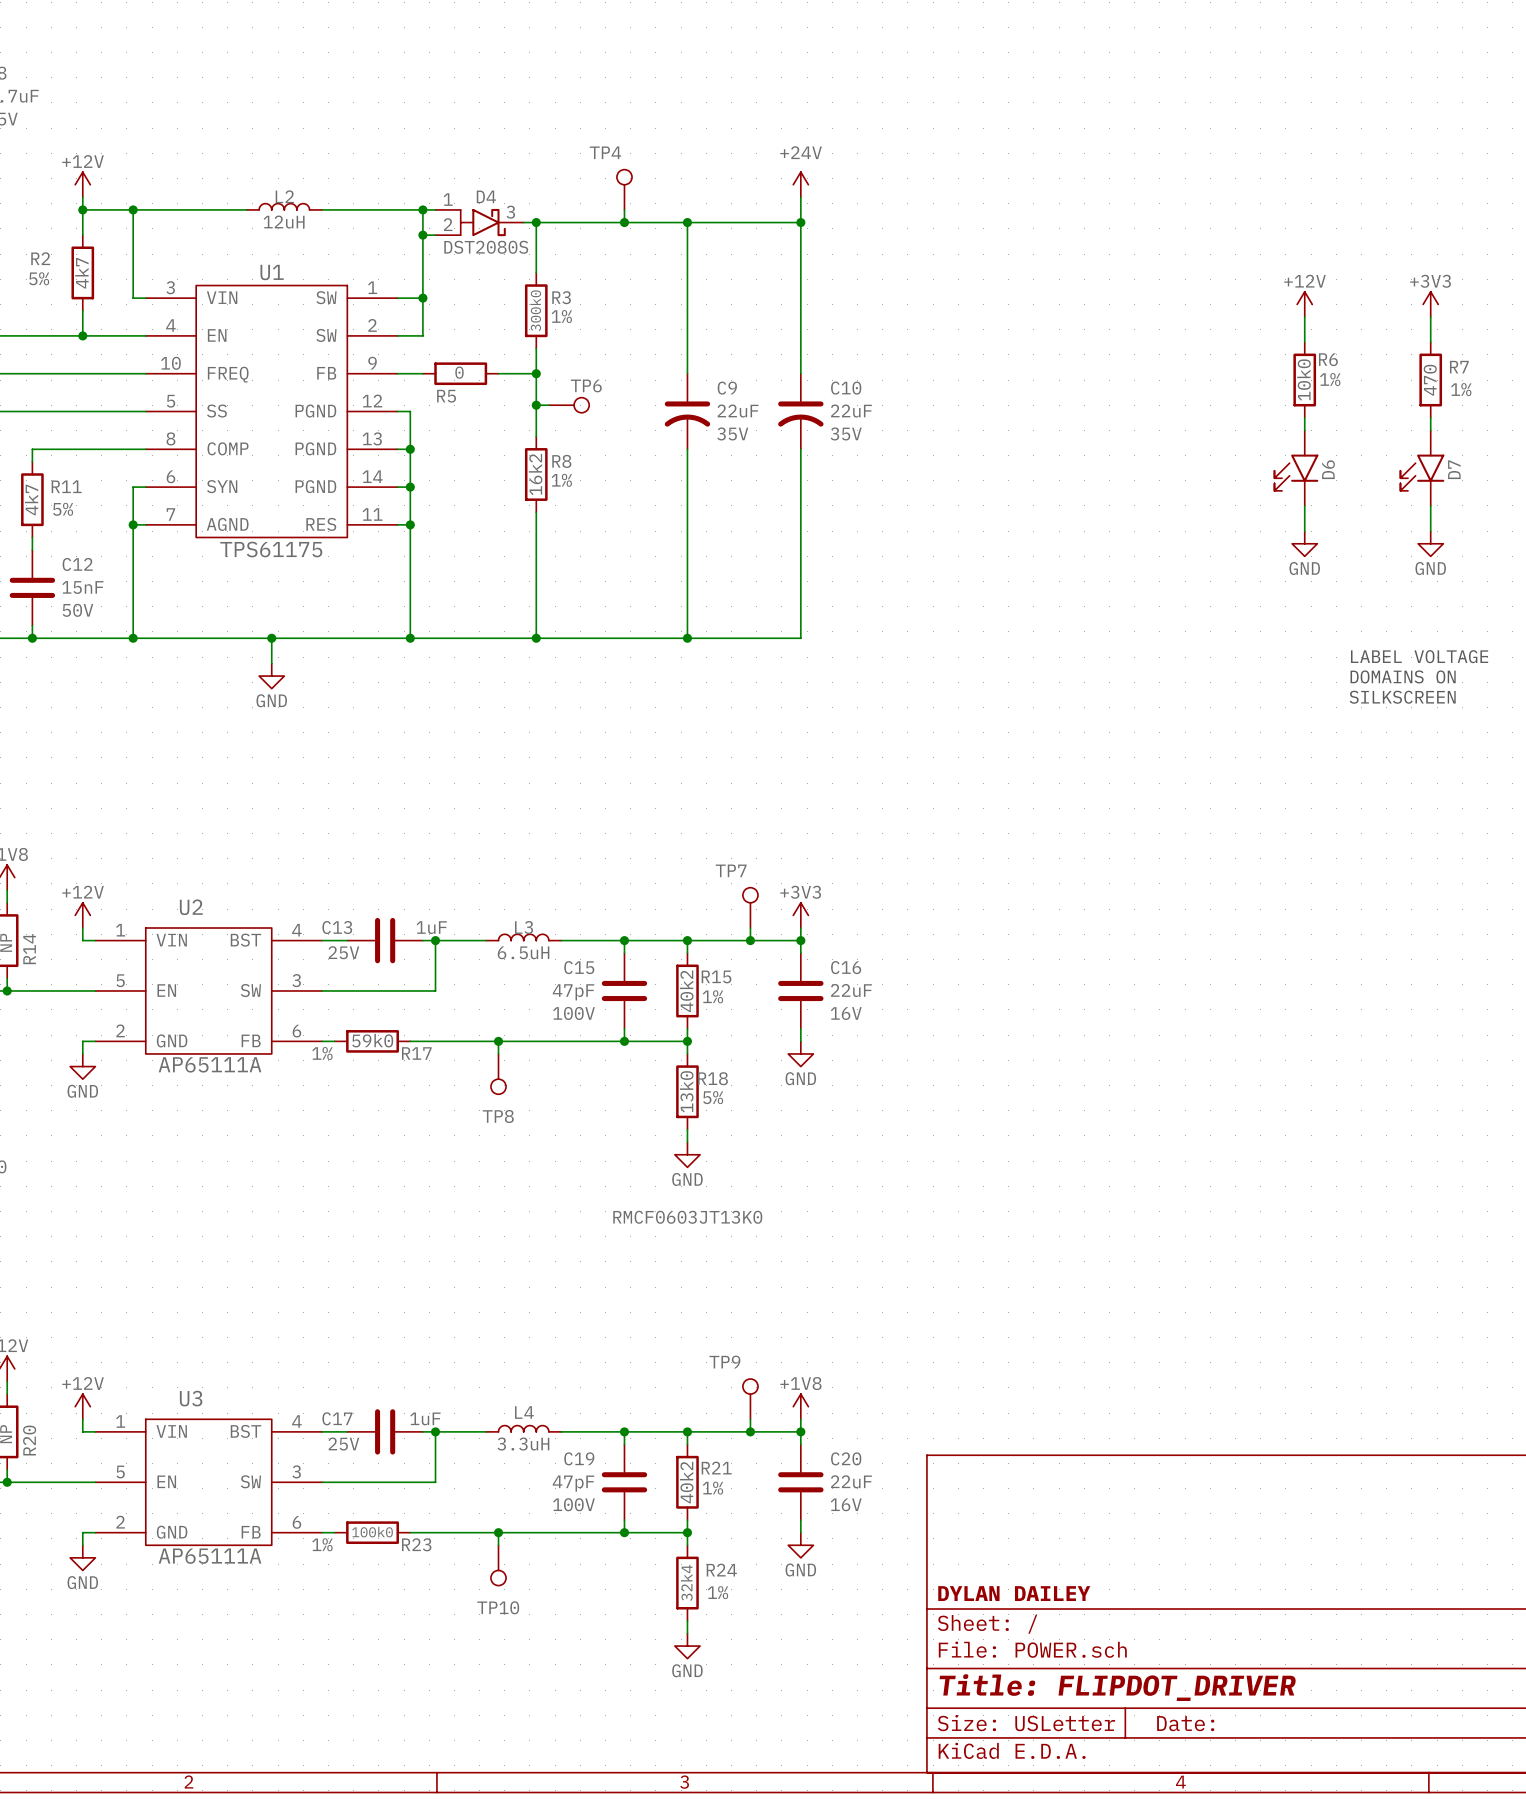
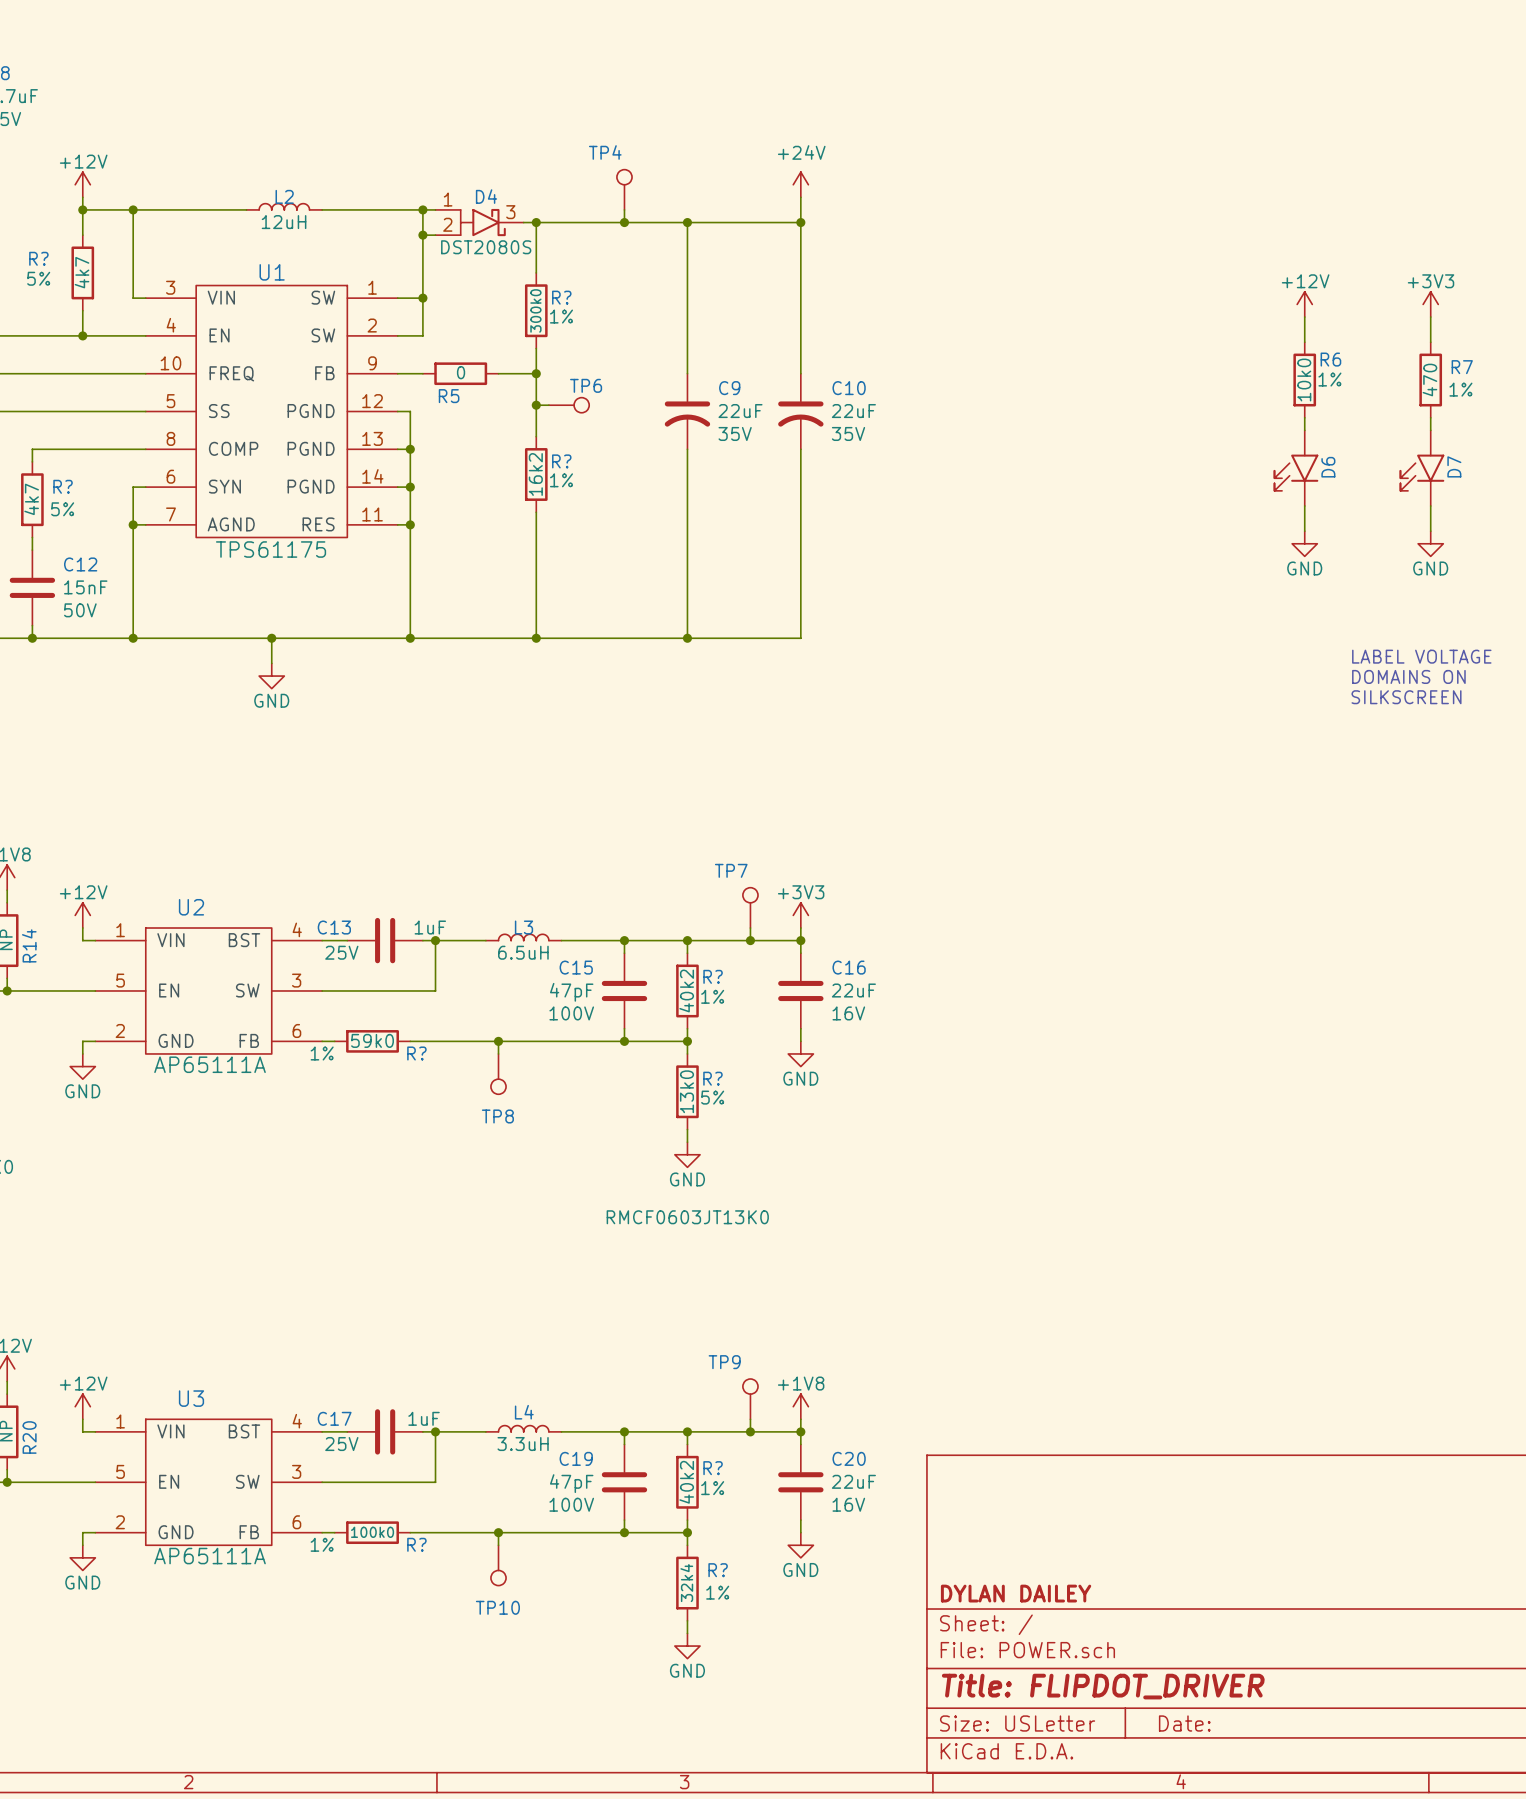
R2 name: R2 (40, 258) -> R? (38, 258)
R3 name: R3 (561, 297) -> R? (561, 297)
R8 name: R8 (561, 461) -> R? (561, 461)
R11 name: R11 (66, 486) -> R? (63, 486)
R15 name: R15 (716, 976) -> R? (713, 976)
R17 name: R17 (416, 1053) -> R? (416, 1053)
R18 name: R18 (712, 1078) -> R? (712, 1078)
R21 name: R21 (716, 1468) -> R? (713, 1468)
R23 name: R23 (416, 1544) -> R? (416, 1544)
R24 name: R24 (721, 1570) -> R? (718, 1570)

